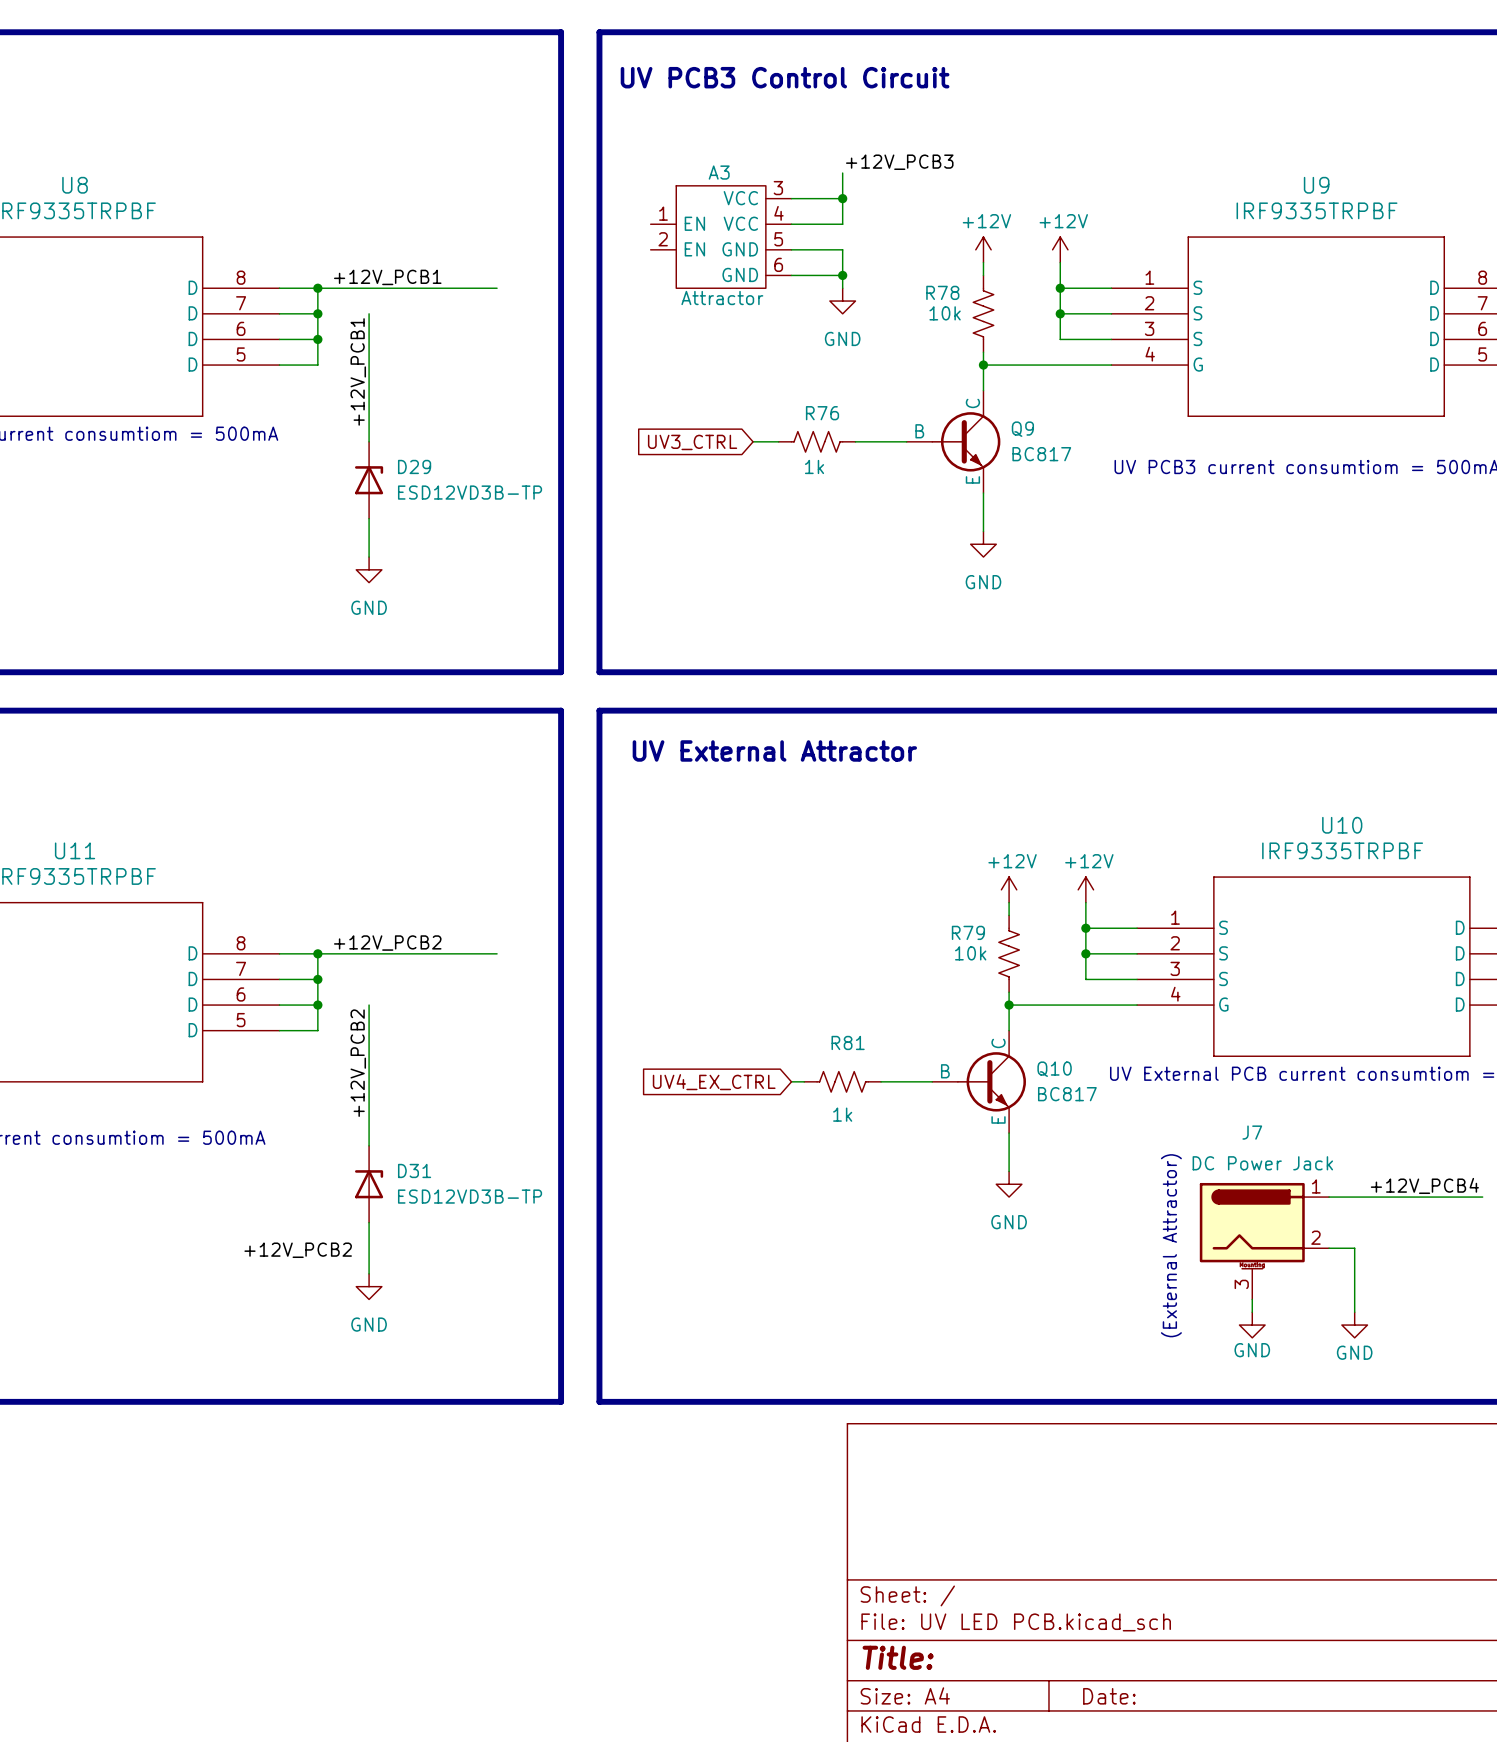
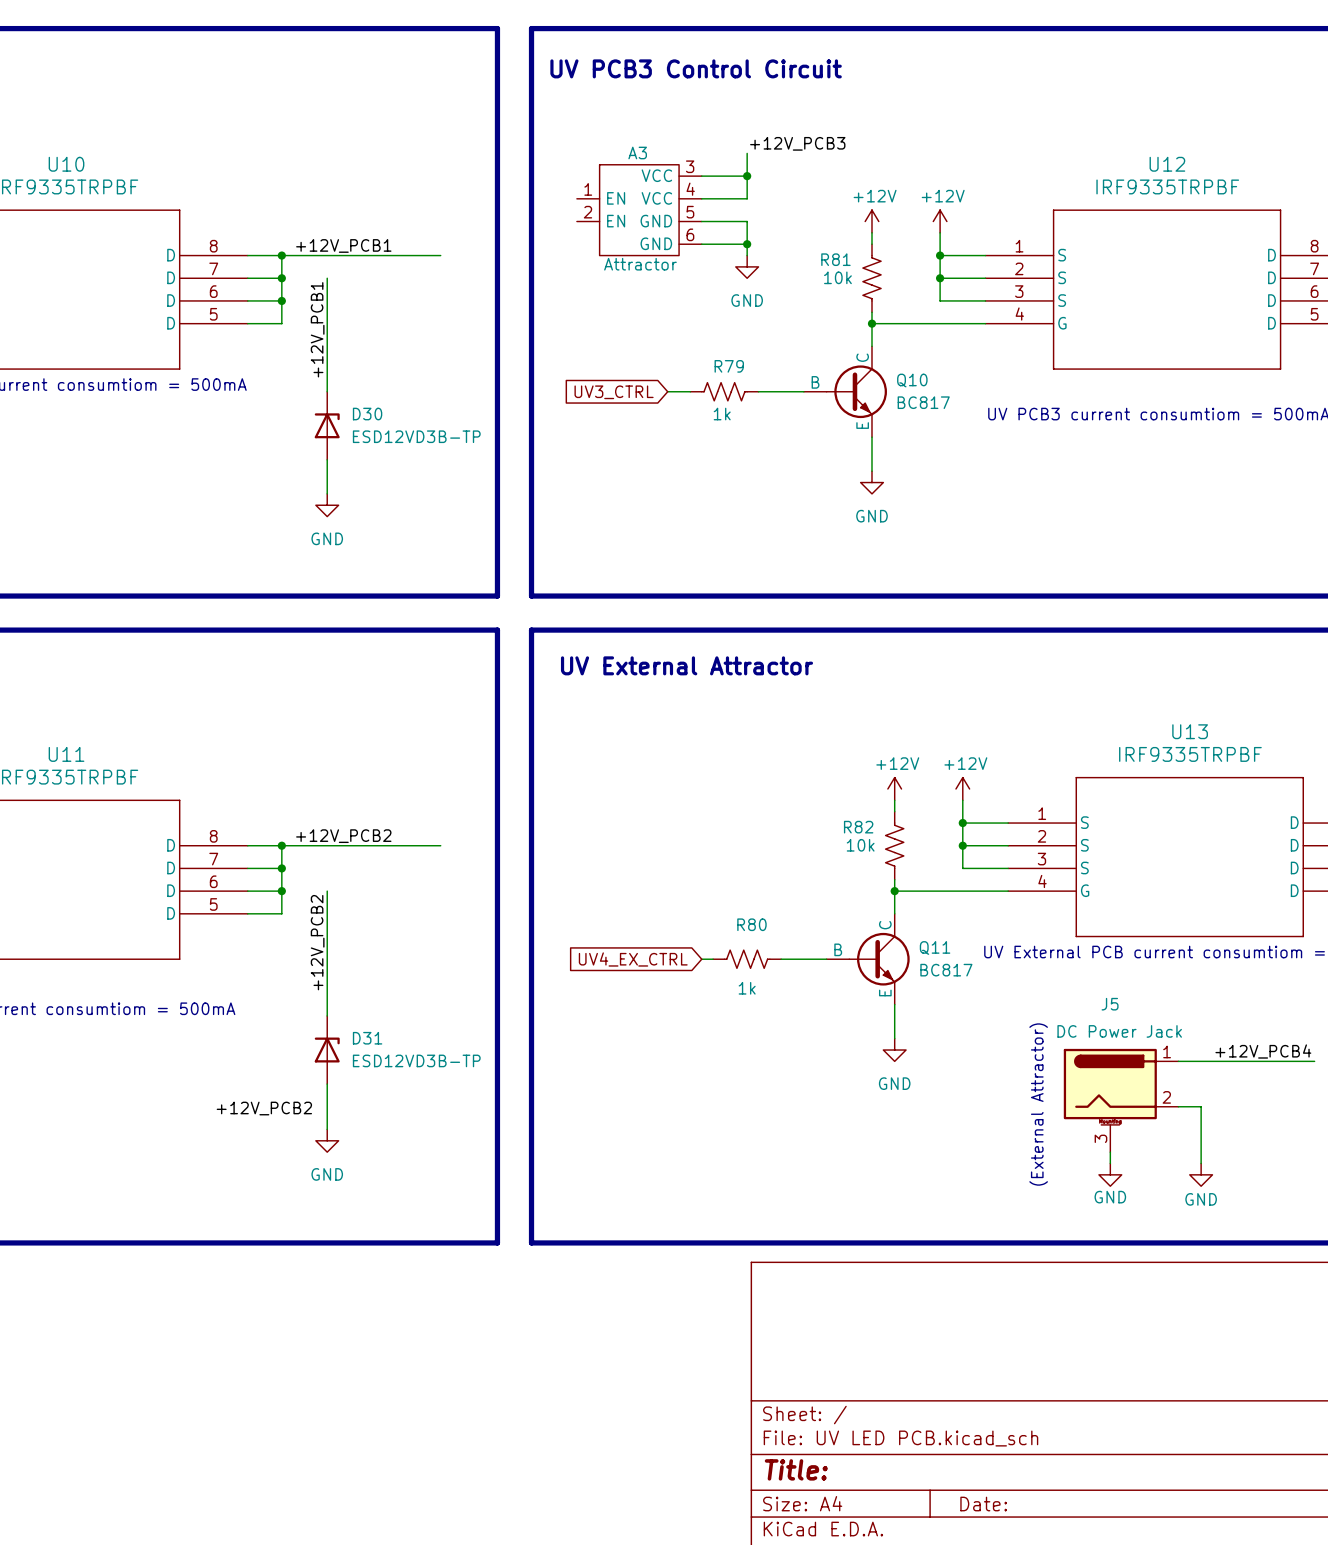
U8 name: U8 (75, 185) -> U10 (66, 164)
U9 name: U9 (1316, 185) -> U12 (1167, 164)
R78 name: R78 (942, 292) -> R81 (835, 259)
R76 name: R76 (822, 413) -> R79 (729, 366)
Q9 name: Q9 (1022, 429) -> Q10 (912, 380)
D29 name: D29 (414, 466) -> D30 (367, 414)
U10 name: U10 (1342, 825) -> U13 (1190, 731)
R79 name: R79 (968, 932) -> R82 (858, 827)
R81 name: R81 (848, 1042) -> R80 (751, 924)
Q10 name: Q10 (1054, 1069) -> Q11 (935, 947)
J7 name: J7 (1252, 1132) -> J5 (1110, 1004)

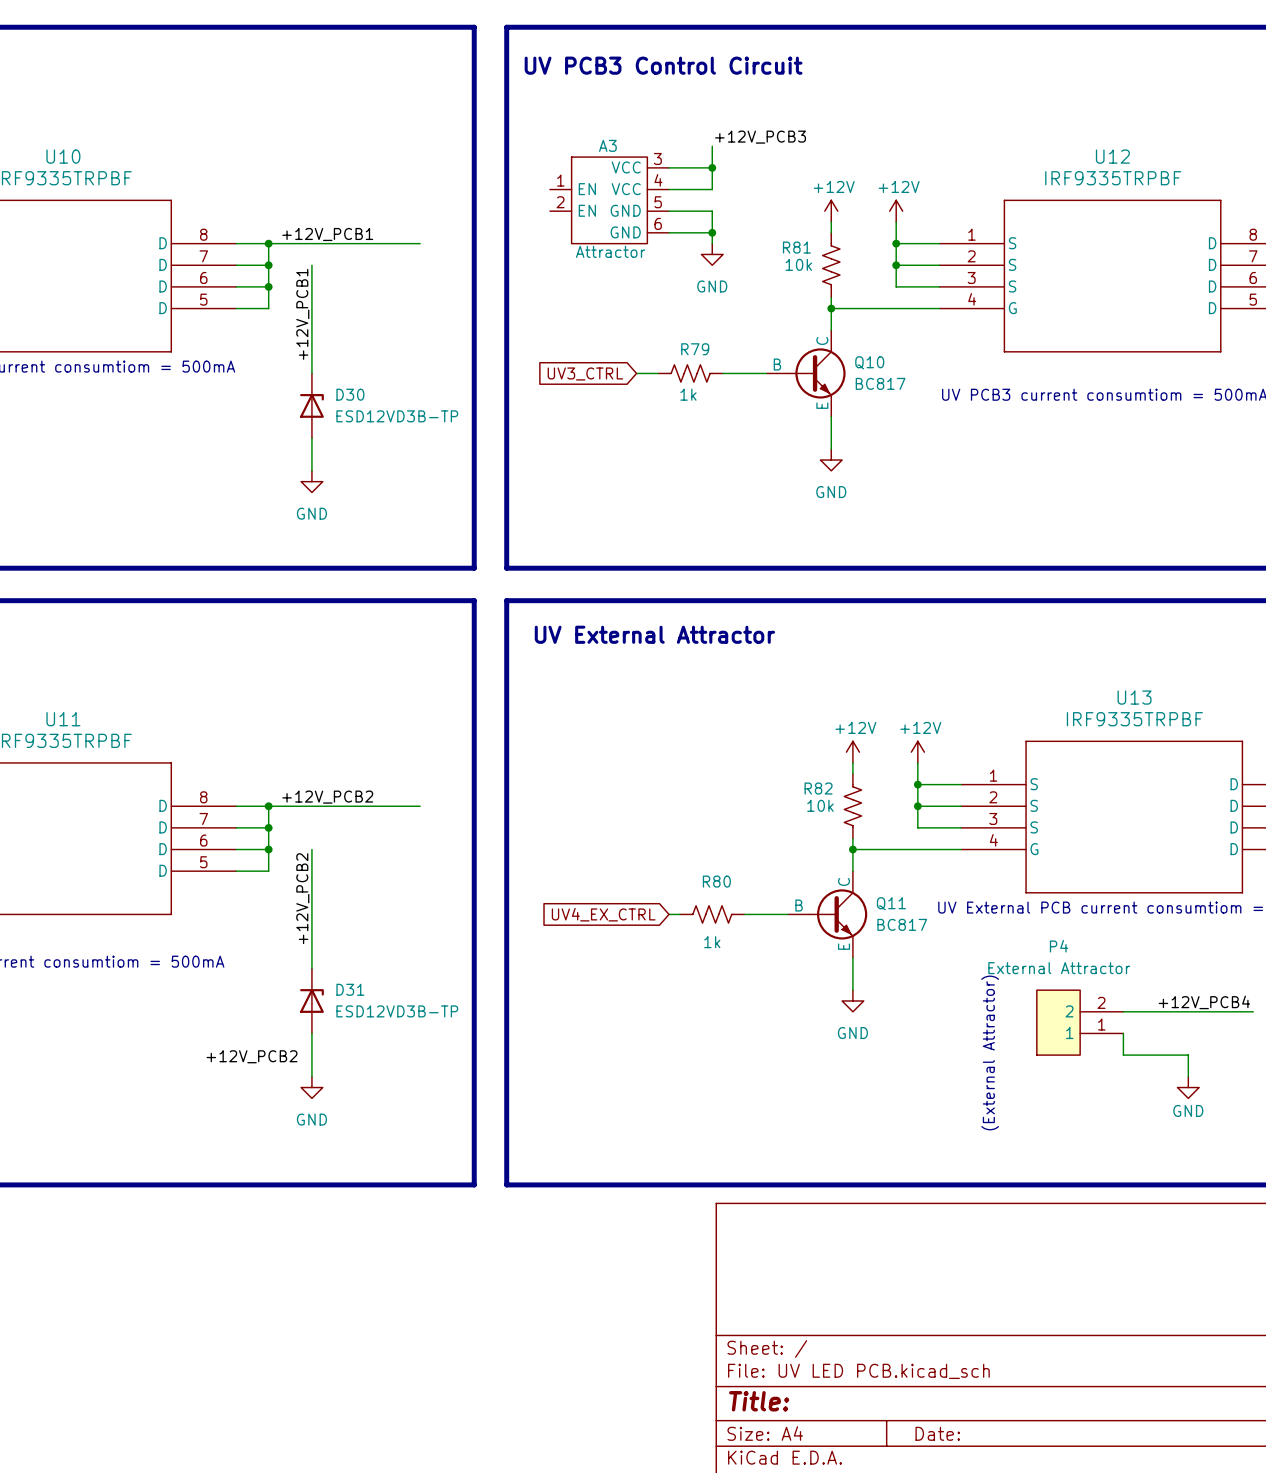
P4: none -> External Attractor (1080, 1022)
wire: none -> (1123, 1033) (1123, 1055)
J5: DC Power Jack (1121, 1100) -> none
wire: (1201, 1106) (1201, 1163) -> (1145, 1055) (1188, 1055) (1188, 1076)
wire: (1110, 1152) (1110, 1163) -> none
power symbol: GND (1110, 1174) -> none
power symbol position: GND (1201, 1174) -> GND (1188, 1087)

